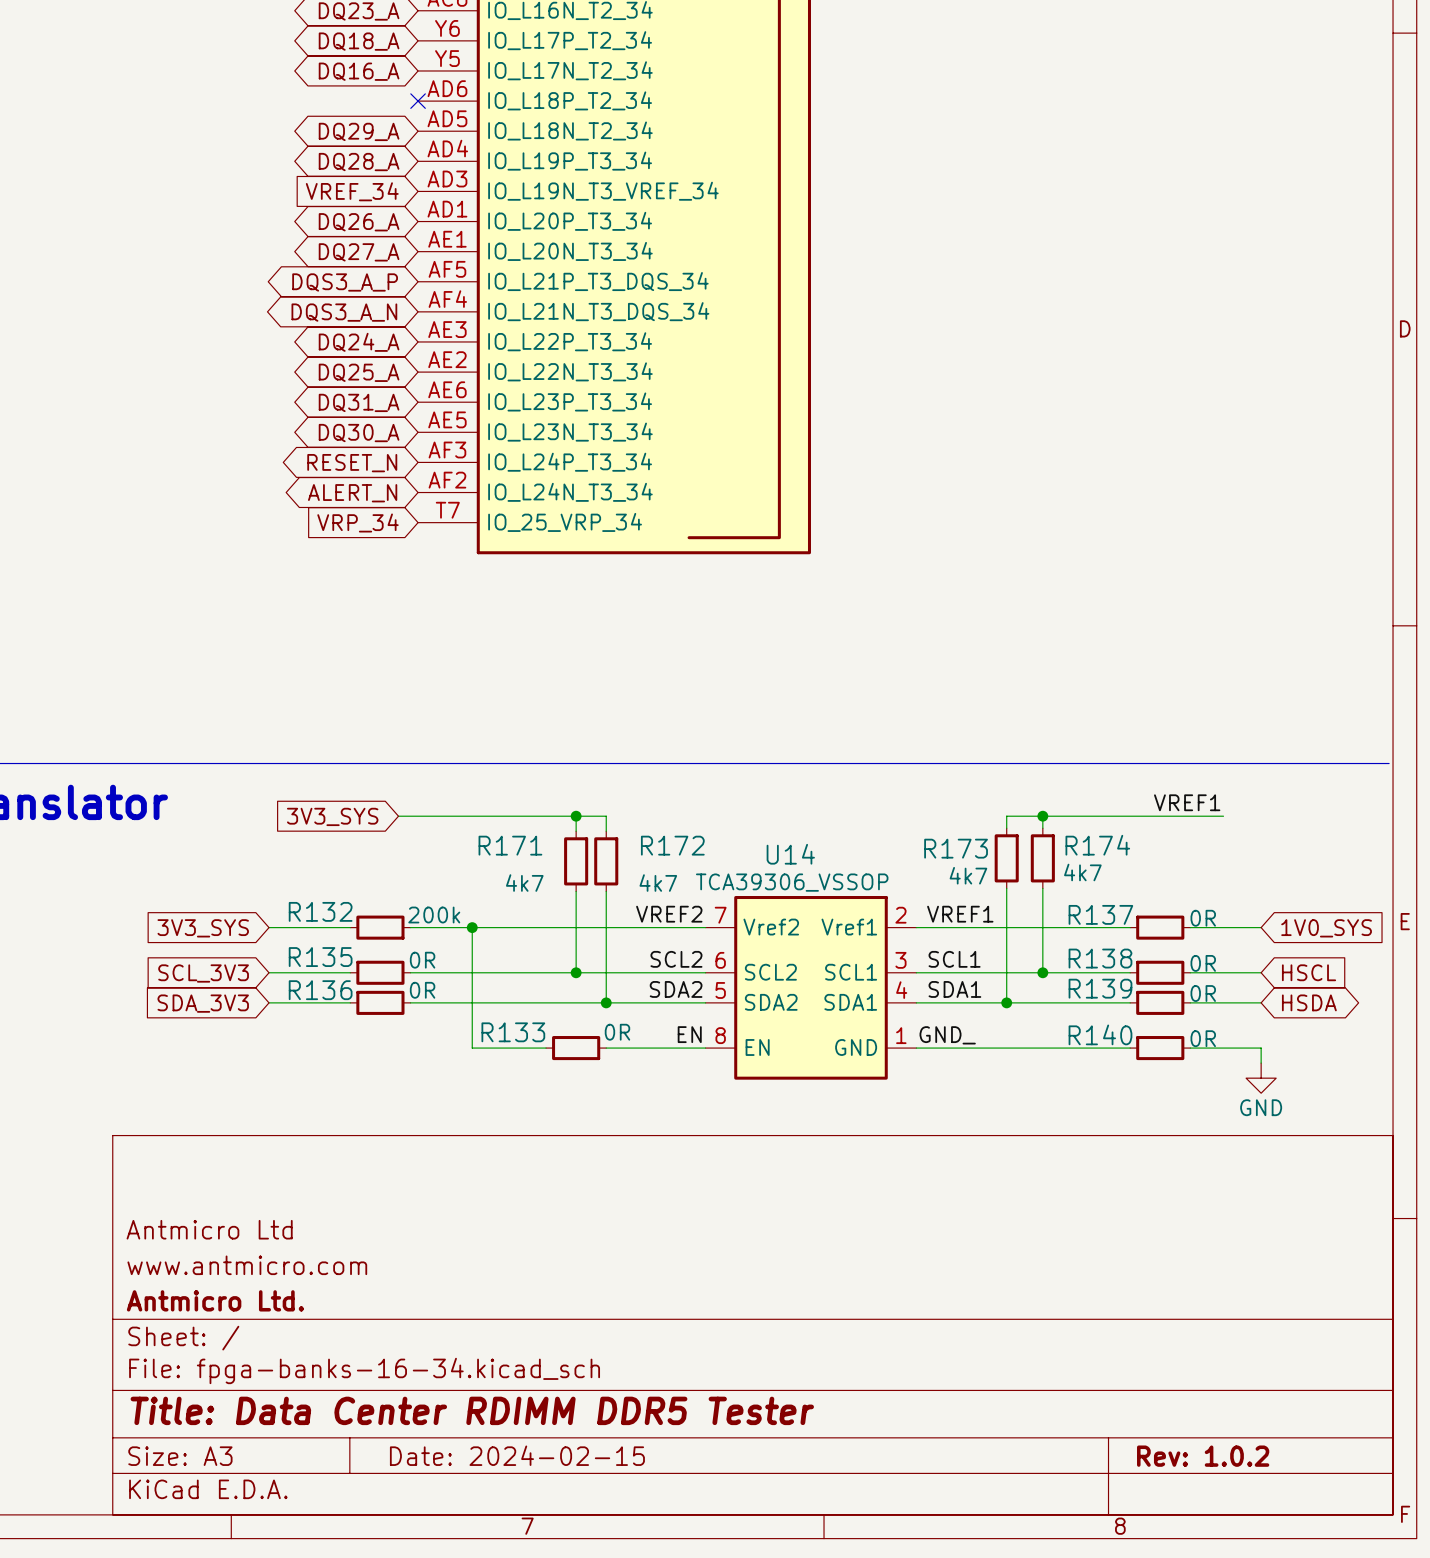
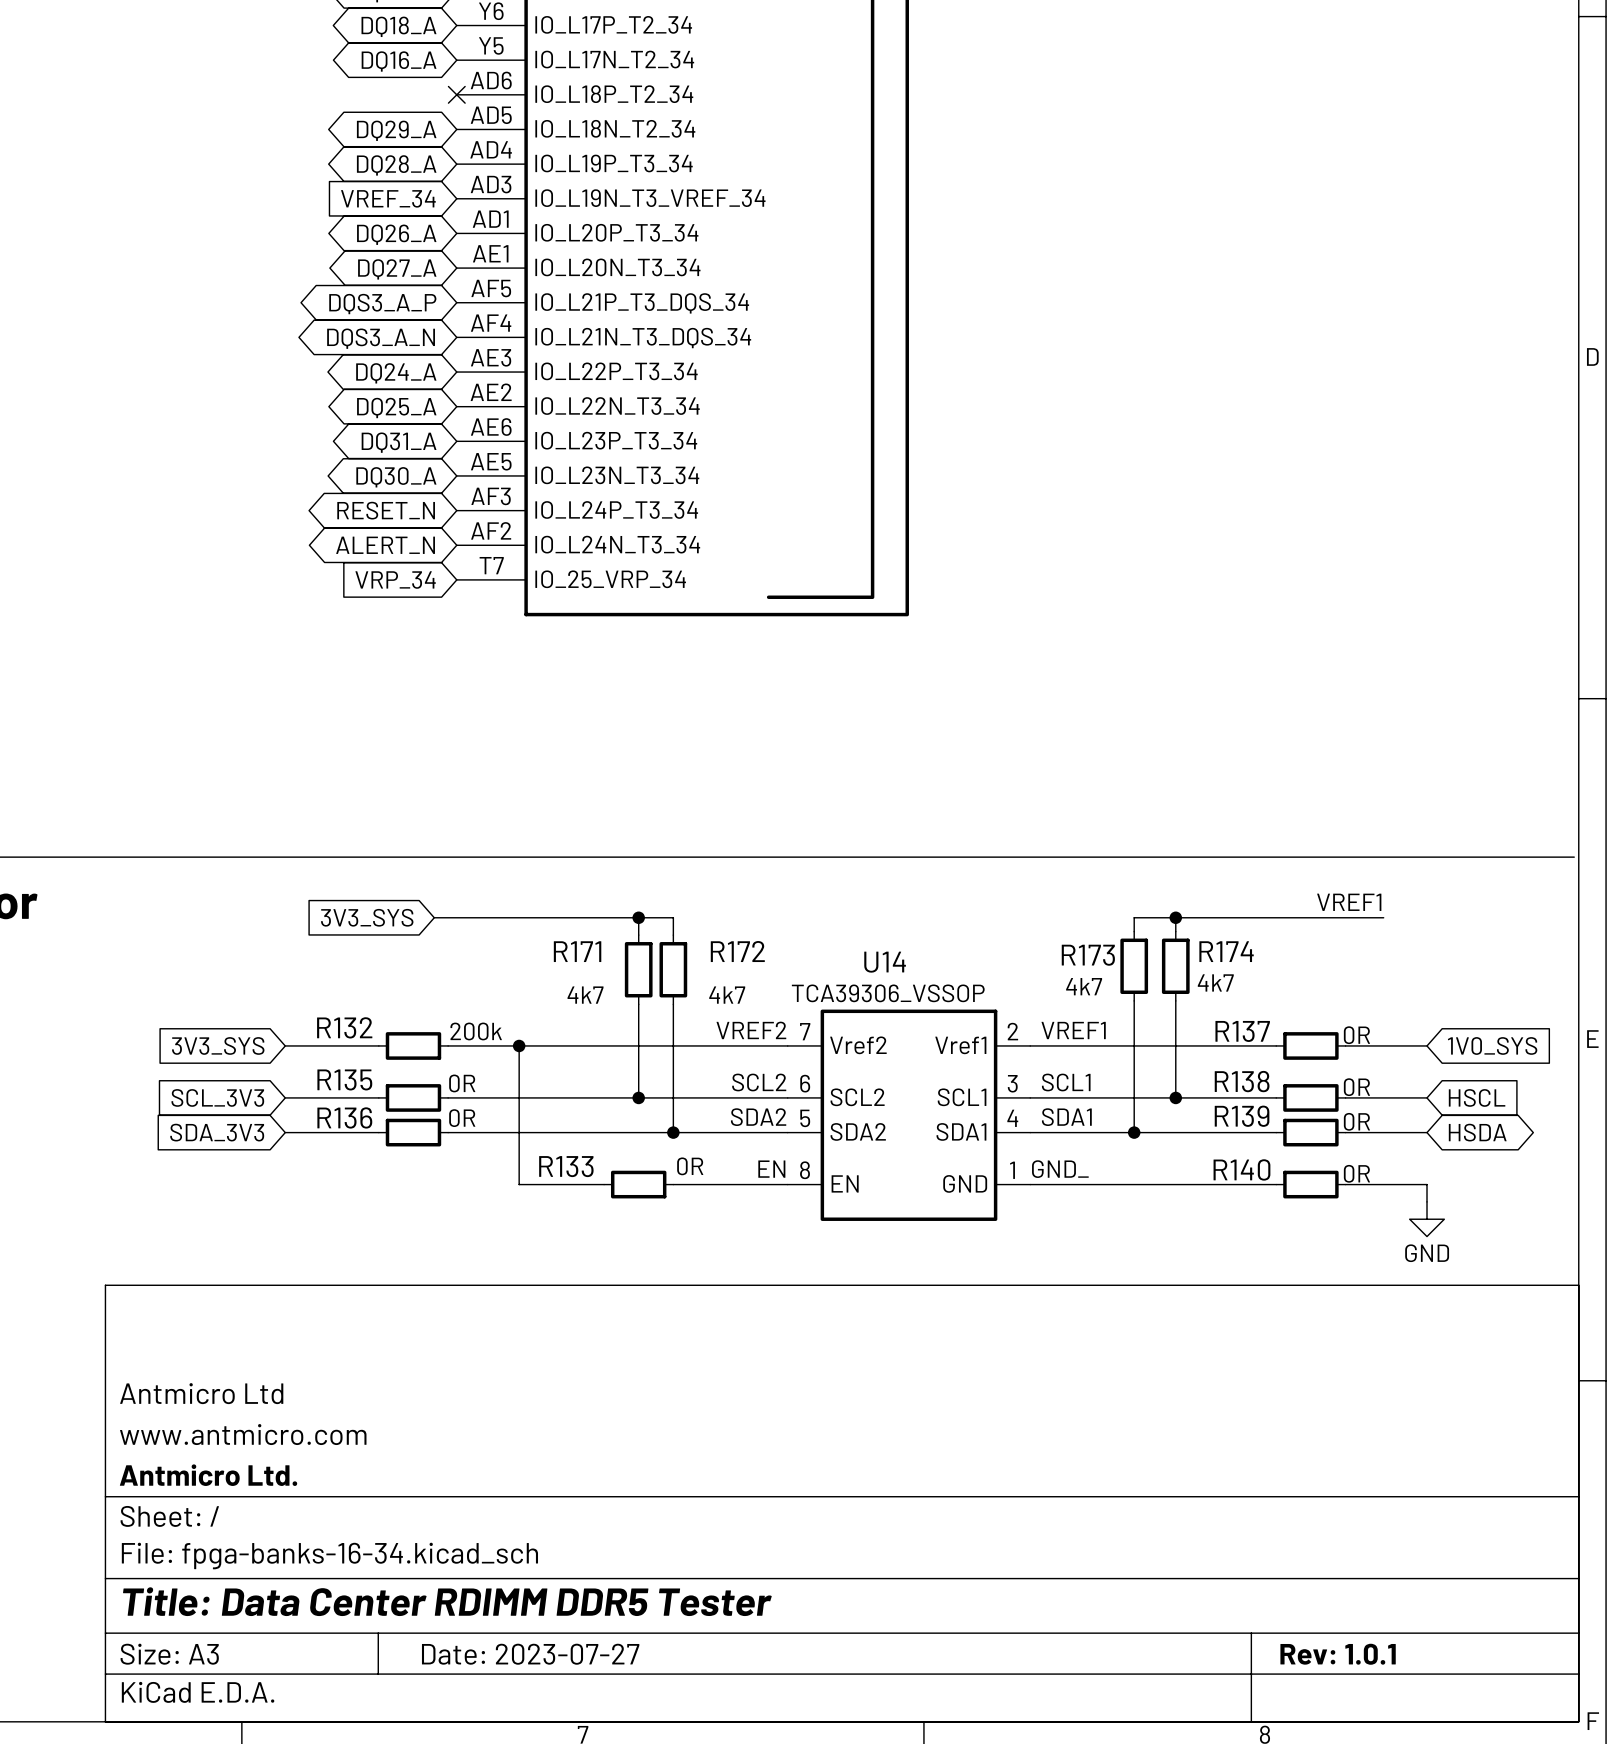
title block: Date: 2024-02-15 (517, 1455) -> Date: 2023-07-27 (530, 1654)
title block: Rev: 1.0.2 (1203, 1456) -> Rev: 1.0.1 (1338, 1654)

